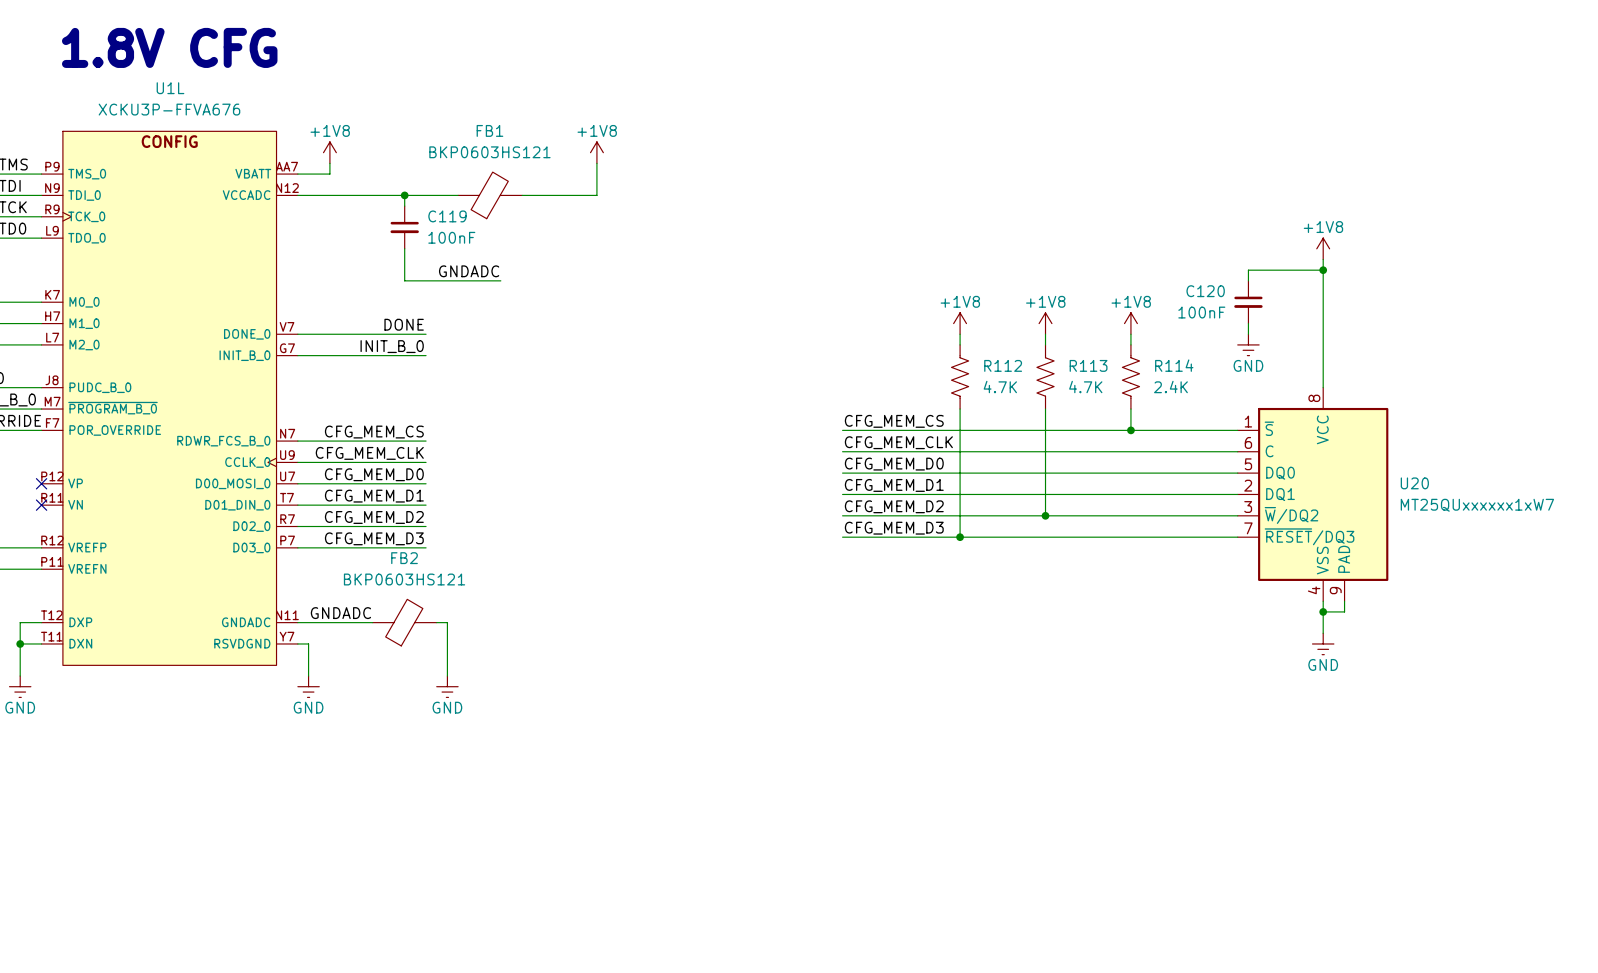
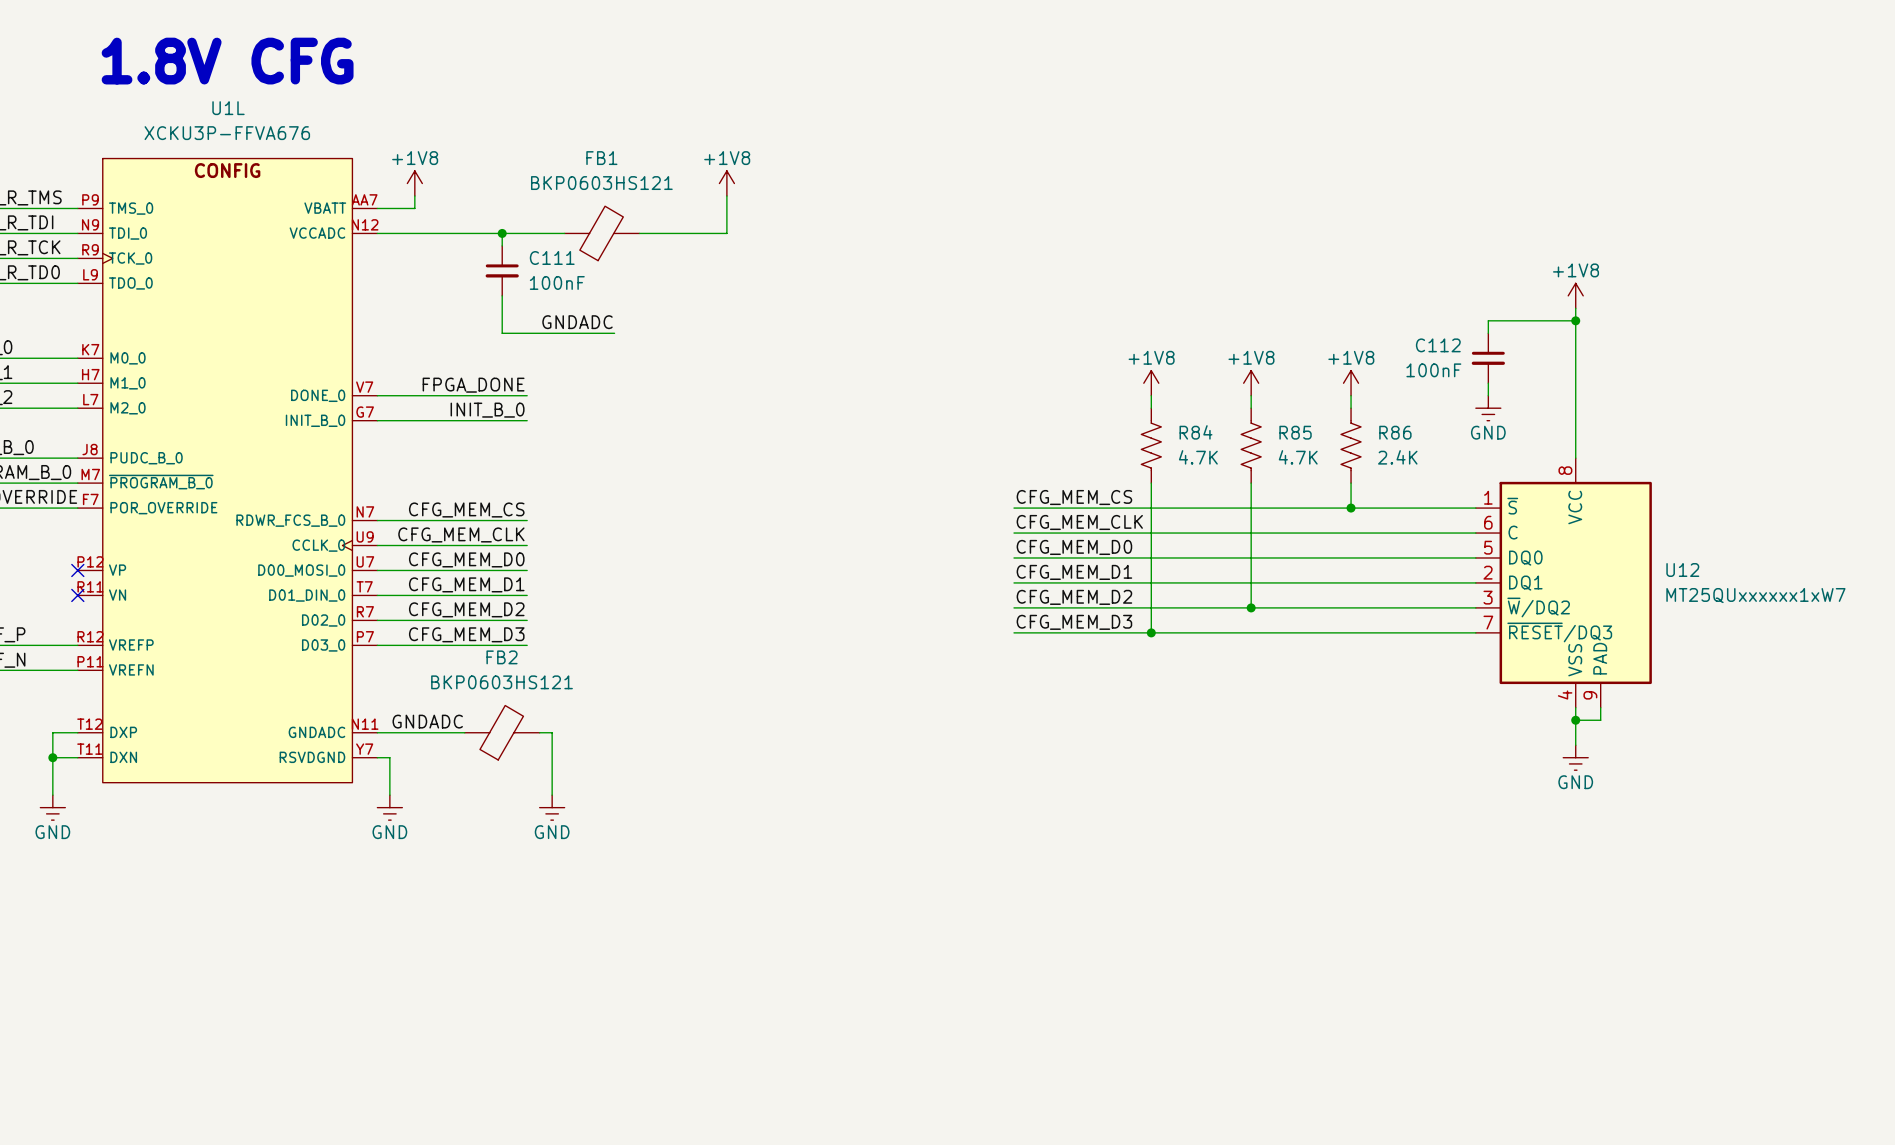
C119 name: C119 (447, 216) -> C111 (552, 258)
C120 name: C120 (1205, 291) -> C112 (1438, 345)
label: DONE (404, 324) -> FPGA_DONE (473, 385)
R112 name: R112 (1003, 365) -> R84 (1195, 432)
R113 name: R113 (1088, 365) -> R85 (1295, 432)
R114 name: R114 (1174, 365) -> R86 (1395, 432)
U20 name: U20 (1414, 483) -> U12 (1682, 570)

